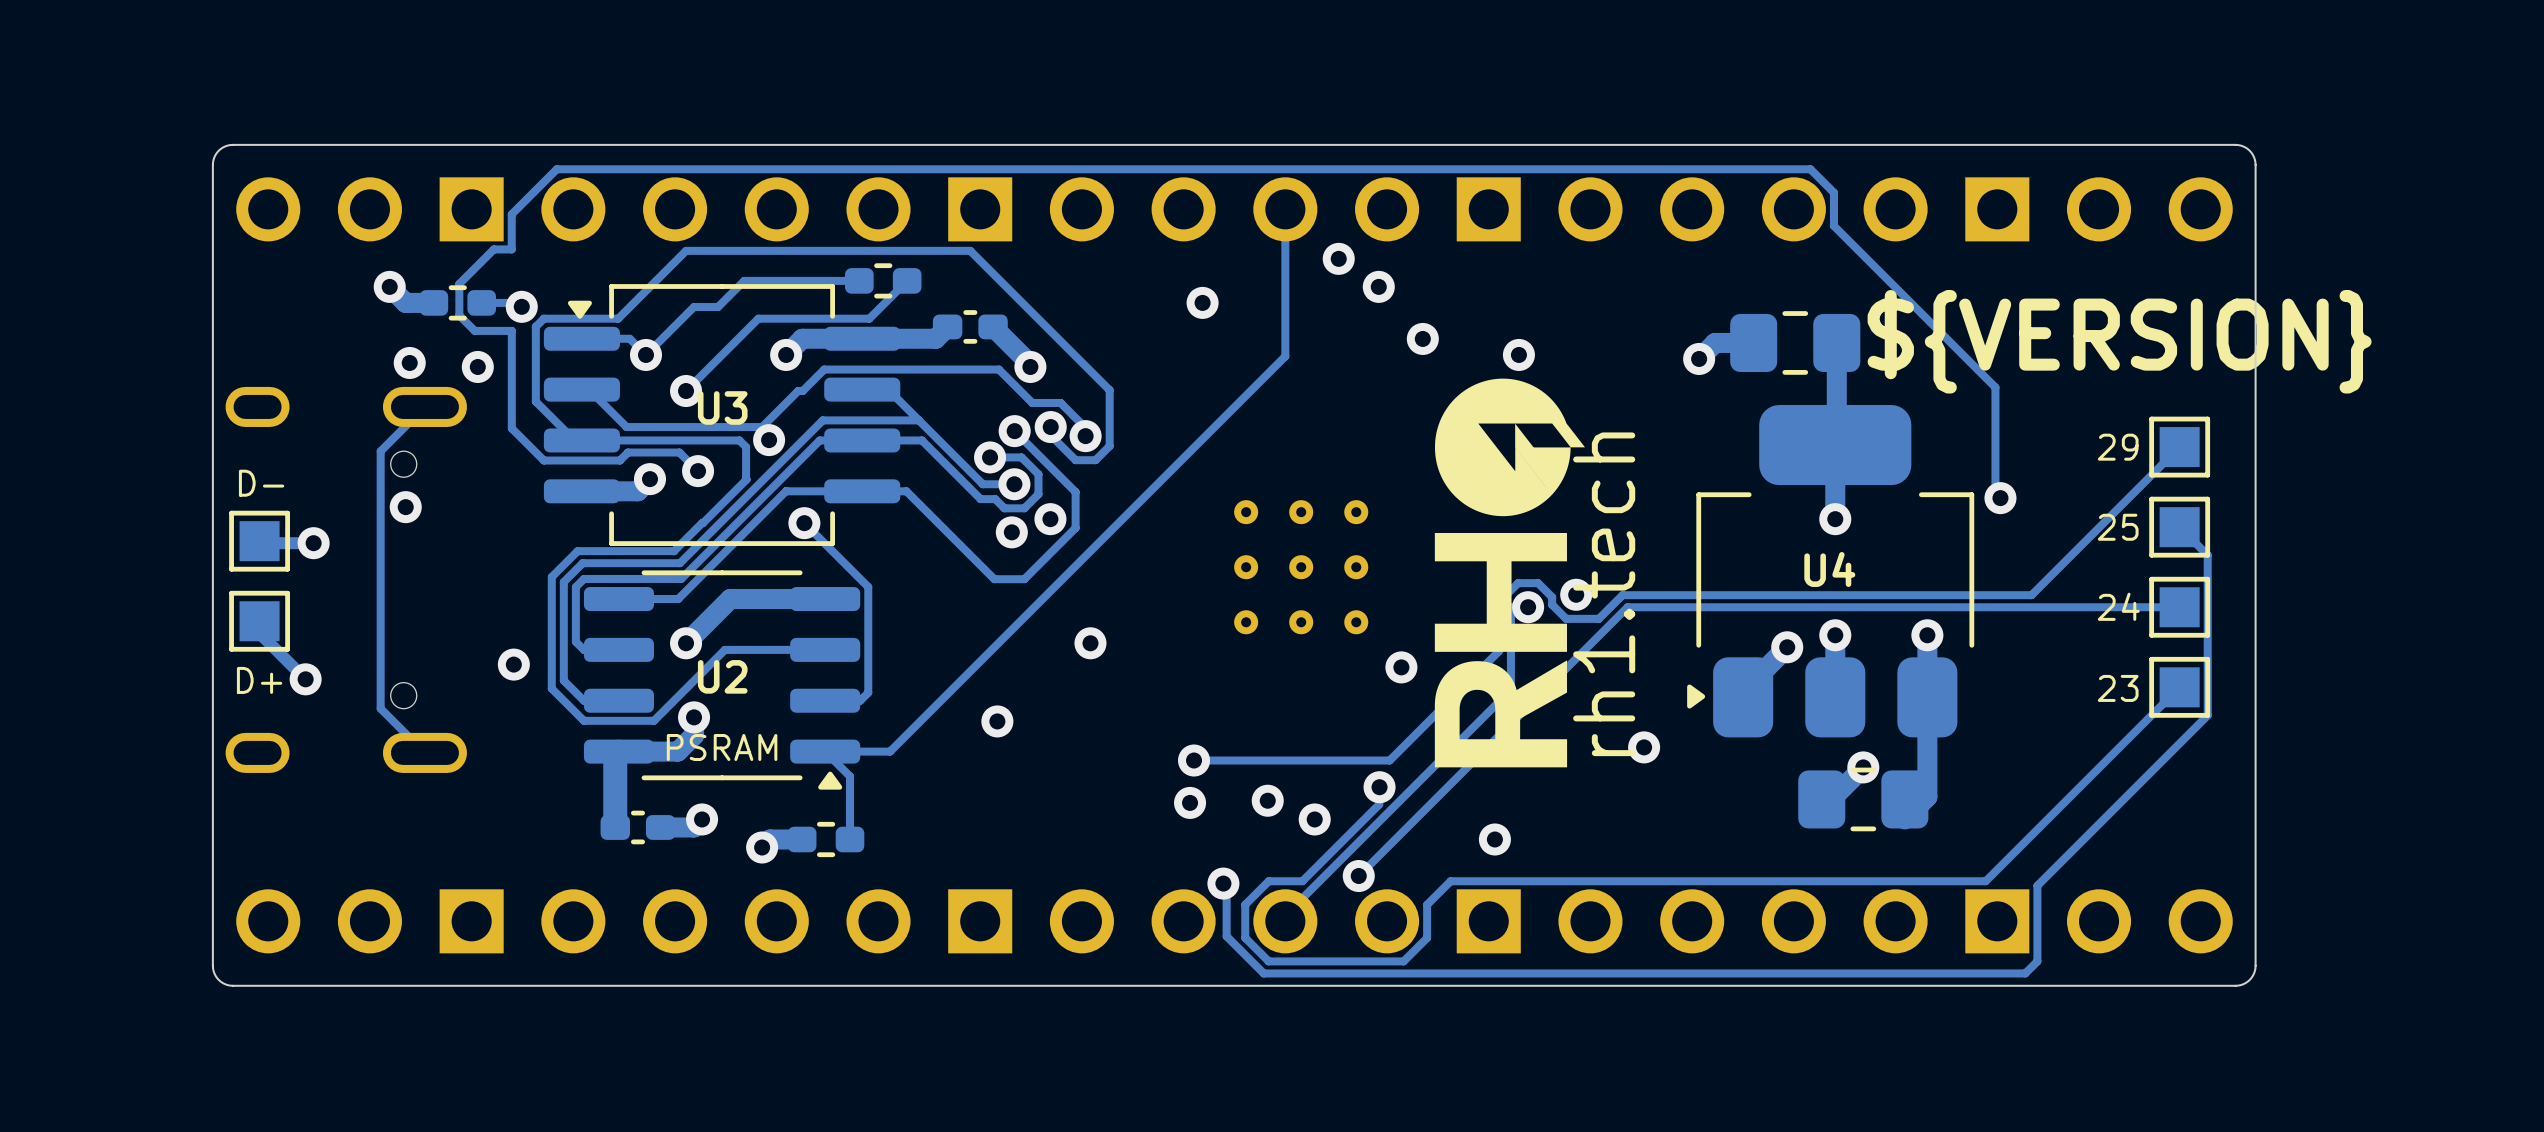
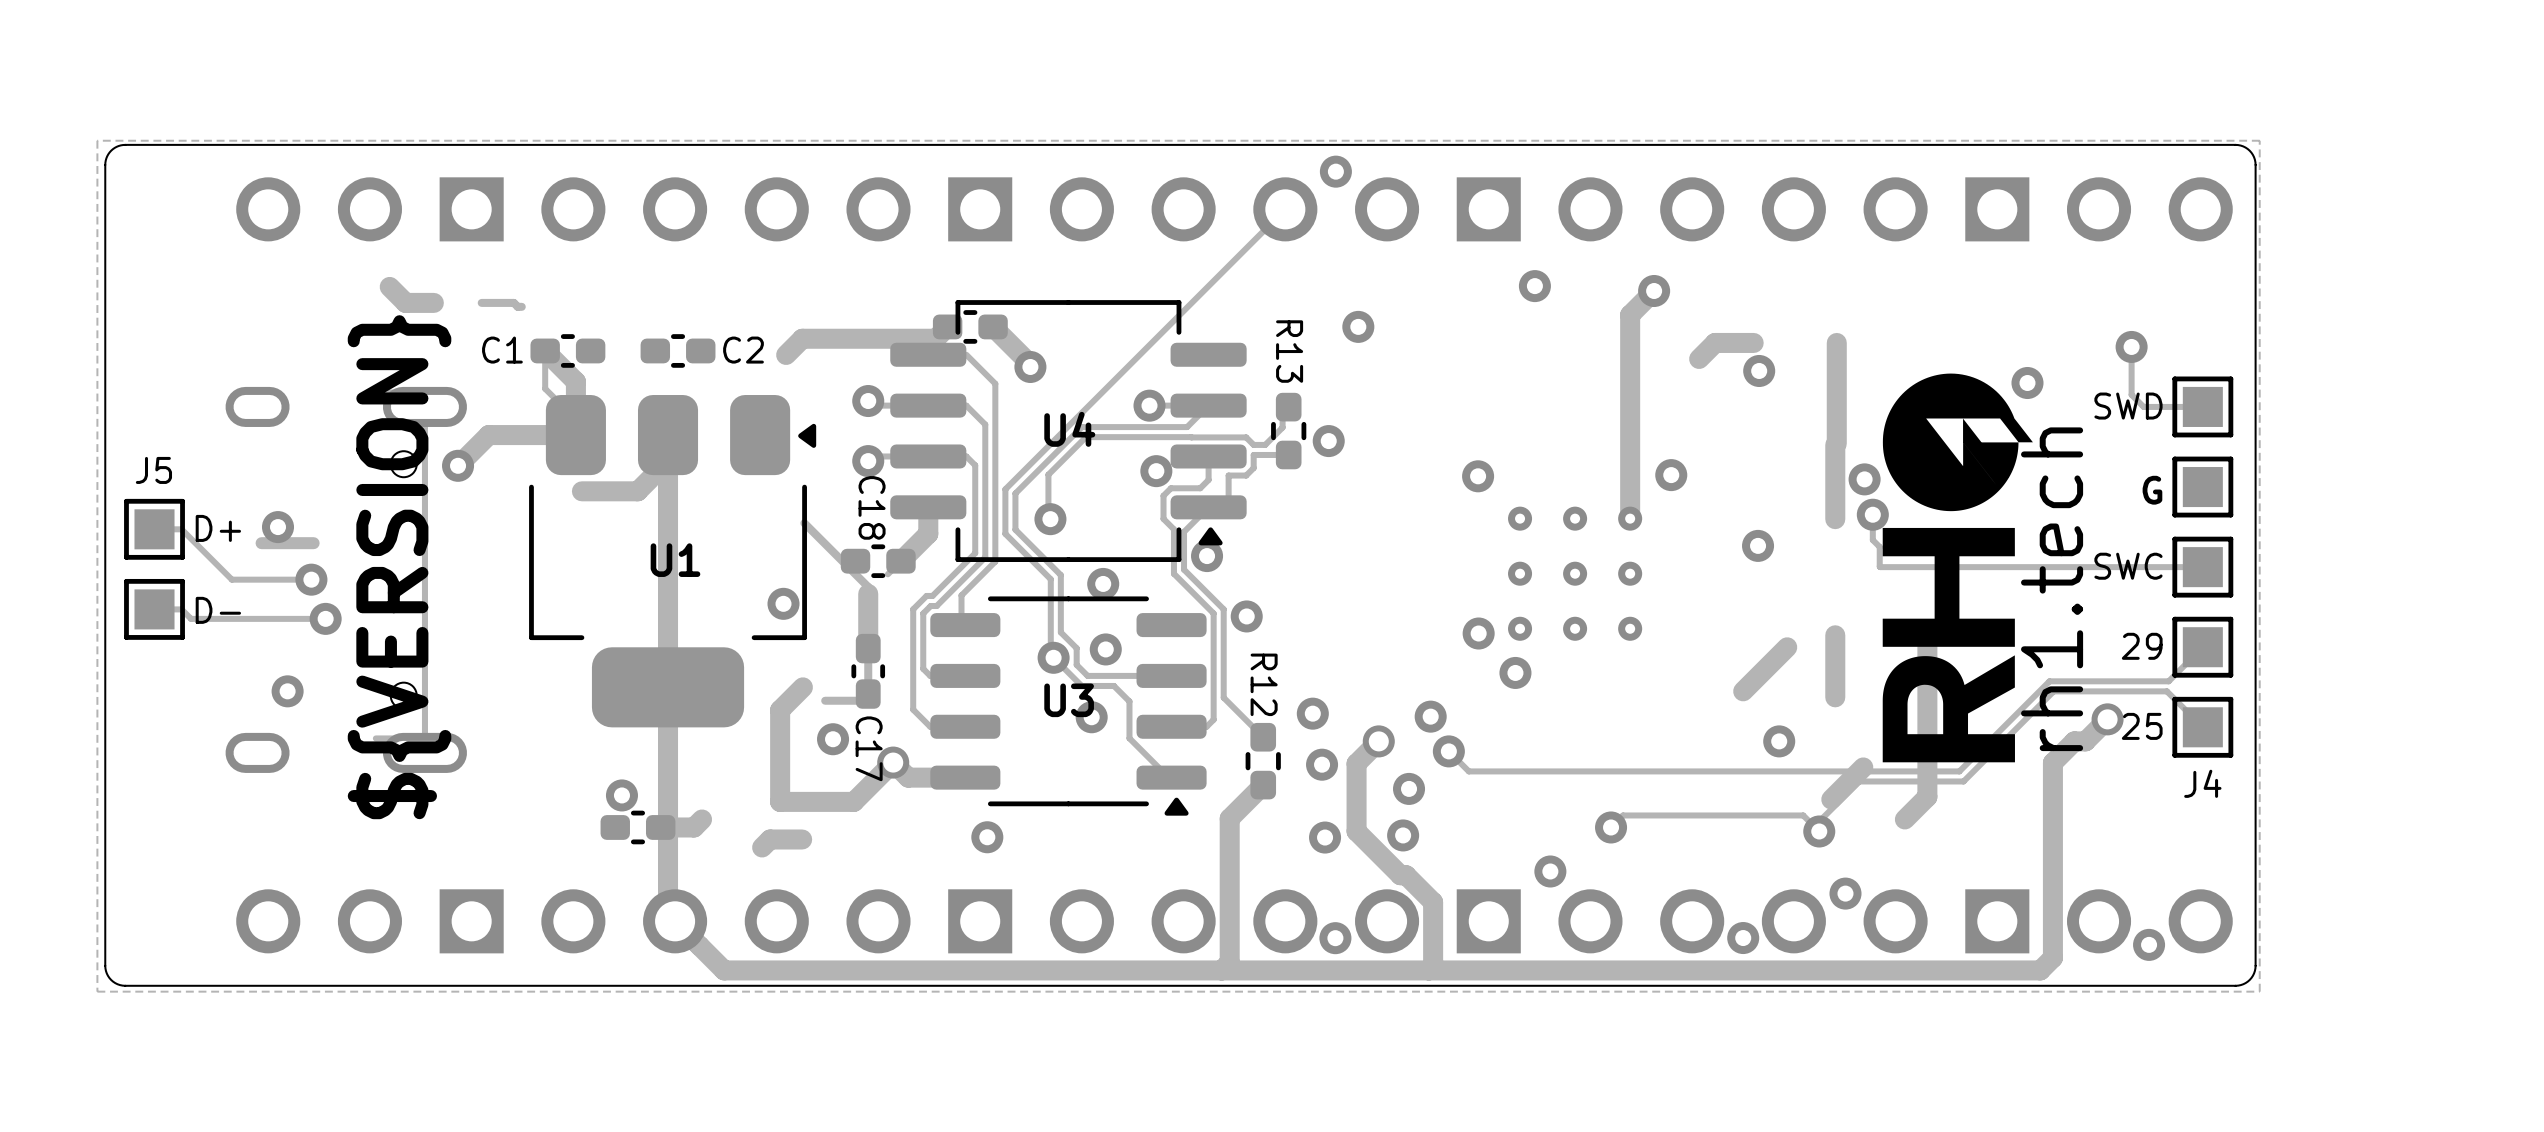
zone outline: none -> (2259, 140) (97, 140) (97, 991) (2259, 991) (2259, 140)
board edge: (232, 144) (218, 150) (212, 164) (212, 965) (214, 973) (218, 979) (225, 984) (232, 985) -> (232, 144) (123, 145) (111, 150) (105, 164) (105, 968) (111, 979) (122, 985) (232, 985)
via: none -> (1335, 171)
track: (1285, 209) (1285, 356) (890, 751) (825, 751) (850, 776) (850, 839) -> (1285, 209) (1005, 489) (1005, 533) (1050, 579) (1050, 646) (1061, 657) (1053, 657) (1081, 685) (1113, 685) (1129, 701) (1129, 738) (1168, 777)
via: (1338, 258) -> none
track: (859, 280) (744, 280) (718, 307) (693, 307) (645, 354) (629, 338) (581, 338) -> none
part: (883, 280) -> none
track: (907, 280) (869, 318) (758, 318) (686, 391) -> none
U3 footprint: [543, 284, 901, 546] -> [930, 596, 1207, 816]
via: (389, 286) -> none
via: (1378, 286) -> none
via: none -> (1534, 286)
track: none -> (1654, 291) (1630, 314) (1630, 518)
via: none -> (1654, 291)
part: (457, 302) -> none
via: (1202, 302) -> none
via: (521, 306) -> none
via: none -> (1358, 326)
via: (1422, 338) -> none
text: ${VERSION} (2119, 341) -> none
part: (1795, 342) -> none
track: none -> (2131, 346) (2131, 394) (2143, 406) (2202, 406)
via: none -> (2131, 346)
track: none -> (545, 350) (545, 388) (575, 419) (575, 381) (545, 350)
C1: none -> (567, 350)
C2: none -> (678, 350)
via: (645, 354) -> none
via: (786, 354) -> none
track: none -> (966, 354) (995, 383) (995, 561) (961, 595) (961, 621)
via: (1518, 354) -> none
via: (1699, 358) -> none
via: (409, 362) -> none
via: (477, 366) -> none
via: none -> (1759, 370)
via: none -> (2027, 383)
track: (589, 389) (626, 427) (762, 427) (798, 391) (802, 391) (824, 369) (998, 369) (1032, 402) (1060, 402) (1085, 427) (1085, 436) -> none
track: (888, 389) (982, 484) (1014, 484) -> none
via: (686, 391) -> none
track: none -> (375, 392) (424, 392) (424, 738) (375, 738)
track: none -> (868, 401) (872, 405) (966, 405) (985, 424) (985, 557) (936, 606) (930, 606) (923, 613) (923, 668) (930, 675) (965, 675)
via: none -> (868, 401)
track: none -> (1282, 401) (1282, 427) (1265, 444) (1253, 444) (1246, 437) (1191, 437)
track: none -> (1149, 405) (1208, 405) (1187, 427) (1081, 427) (1015, 493) (1015, 529) (1060, 575) (1060, 632) (1076, 648) (1076, 664) (1087, 675) (1171, 675)
via: none -> (1149, 405)
U4 footprint: [1687, 405, 1975, 738] -> [890, 300, 1247, 562]
track: (424, 406) (380, 451) (380, 708) (424, 752) -> none
text: none -> SWD (2128, 406)
track: (918, 420) (822, 420) (679, 563) (582, 563) (563, 582) (563, 680) (583, 700) (618, 700) -> none
track: (1050, 427) (1050, 435) (1075, 460) (1095, 460) (1109, 446) (1109, 390) (970, 250) (686, 250) (618, 318) (543, 318) (535, 326) (535, 401) (574, 440) -> none
via: (1050, 427) -> none
track: (1014, 431) (1075, 492) (1075, 527) (1024, 579) (994, 579) (906, 491) (786, 491) -> none
via: (1014, 431) -> none
R13: none -> (1288, 431)
track: none -> (575, 435) (488, 435) (458, 465)
track: none -> (668, 435) (668, 914)
drawing position: (1524, 435) -> (1972, 430)
via: (1085, 436) -> none
track: none -> (1191, 437) (1085, 437) (1048, 474) (1048, 511)
track: (581, 440) (739, 440) (746, 447) (746, 479) -> none
via: (769, 440) -> none
via: none -> (1328, 441)
drawing position: (1510, 447) -> (1957, 442)
text position: 29 (2118, 447) -> 29 (2142, 646)
track: (2179, 447) (2031, 595) (1622, 595) (1598, 618) (1566, 618) (1552, 604) (1552, 597) (1538, 583) (1518, 583) (1498, 602) (1498, 651) (1389, 760) (1194, 760) -> none
track: none -> (1288, 454) (1253, 454) (1253, 468) (1246, 475) (1228, 475) (1228, 499)
track: none -> (1208, 456) (1208, 479) (1200, 488) (1170, 488) (1163, 495) (1163, 518) (1173, 529) (1173, 573) (1213, 613) (1213, 719) (1206, 726) (1171, 726)
track: (990, 457) (1021, 457) (1038, 474) (1038, 494) (1024, 508) (1004, 508) (995, 499) (980, 499) (921, 440) (819, 440) (681, 578) (583, 578) (575, 587) (575, 641) (583, 649) (618, 649) -> none
via: (990, 457) -> none
track: none -> (868, 461) (872, 456) (966, 456) (975, 465) (975, 553) (932, 595) (926, 595) (913, 609) (913, 709) (930, 726) (965, 726)
via: none -> (868, 461)
via: none -> (458, 465)
drawing position: (1552, 465) -> (1999, 460)
track: (698, 471) (679, 452) (627, 452) (619, 460) (543, 460) (511, 428) (511, 330) (474, 330) (459, 315) (459, 283) (493, 249) (511, 249) (511, 214) (556, 169) (1810, 169) (1833, 192) (1833, 225) (1995, 387) (1995, 493) (2000, 498) -> none
via: (698, 471) -> none
via: none -> (1156, 471)
via: none -> (1671, 475)
via: none -> (1478, 476)
via: (650, 479) -> none
track: (746, 479) (674, 551) (577, 551) (551, 577) (551, 688) (583, 720) (653, 720) (724, 649) (825, 649) -> none
via: none -> (1864, 479)
text position: D- (261, 483) -> D- (218, 610)
via: (1014, 484) -> none
text: none -> G (2152, 490)
track: (786, 491) (678, 599) (618, 599) -> none
via: (2000, 498) -> none
via: (405, 507) -> none
track: none -> (928, 507) (928, 533) (887, 574)
track: none -> (1208, 507) (1184, 531) (1184, 569) (1223, 609) (1223, 697) (1263, 737)
track: none -> (1872, 514) (1872, 540) (1879, 546) (1879, 566)
via: none -> (1872, 514)
via: (1835, 519) -> none
via: (804, 523) -> none
via: none -> (277, 527)
text position: 25 (2118, 527) -> 25 (2142, 726)
track: (2179, 527) (2207, 555) (2207, 715) (2037, 885) (2037, 961) (2025, 973) (1263, 973) (1226, 936) (1226, 891) -> none
track: none -> (154, 529) (181, 529) (231, 579) (311, 579)
via: (1011, 532) -> none
via: (313, 543) -> none
via: none -> (1758, 545)
via: none -> (1207, 556)
U1: none -> (672, 561)
C18: none -> (878, 561)
text: none -> SWC (2128, 566)
text: none -> ${VERSION} (399, 567)
part position: (1301, 567) -> (1575, 573)
part: (2179, 567) -> none
track: none -> (2202, 567) (1880, 567)
J4: none -> (2202, 567)
J5: none -> (154, 569)
via: none -> (311, 579)
part: (259, 581) -> none
via: none -> (1103, 583)
track width: thin (868, 587) (868, 692) -> thick (868, 587) (868, 692)
drawing position: (1500, 592) -> (1948, 587)
via: (1576, 594) -> none
text position: rh1.tech (1604, 594) -> rh1.tech (2052, 589)
track: (825, 599) (730, 599) (686, 643) -> none
via: none -> (783, 603)
text: 24 (2118, 606) -> none
track: (1528, 607) (1511, 607) (1510, 689) (1285, 915) -> none
via: (1528, 607) -> none
track: (2179, 607) (1627, 607) (1358, 876) -> none
track: none -> (154, 609) (181, 609) (191, 618) (325, 618)
via: none -> (1246, 616)
via: none -> (325, 618)
track: (259, 633) (305, 679) -> none
via: none -> (1478, 633)
via: (1835, 635) -> none
via: (1927, 635) -> none
via: (686, 643) -> none
via position: (1090, 643) -> (1105, 649)
via: (1787, 647) -> none
track: none -> (2202, 647) (2168, 681) (2049, 681) (1959, 771) (1468, 771) (1448, 751)
via: none -> (1053, 657)
via: (513, 664) -> none
via: (1401, 667) -> none
C17: none -> (868, 671)
via: none -> (1515, 672)
via position: (305, 679) -> (287, 691)
text position: D+ (259, 680) -> D+ (218, 528)
U2: (722, 680) -> none
track: none -> (802, 687) (780, 710) (780, 801) (853, 801) (893, 762) (908, 777) (965, 777)
track: (2179, 687) (1985, 881) (1450, 881) (1427, 904) (1427, 937) (1403, 961) (1268, 961) (1245, 937) (1245, 904) (1268, 881) (1302, 881) (1379, 804) (1379, 787) -> none
text: 23 (2118, 688) -> none
via: none -> (1312, 713)
drawing position: (1500, 713) -> (1948, 708)
via: none -> (1430, 716)
track: (694, 717) (694, 735) (677, 751) (618, 751) (615, 755) (615, 827) -> none
via: (694, 717) -> none
via: none -> (1091, 717)
track: none -> (2107, 719) (2085, 741) (2074, 741) (2052, 762) (2052, 957) (2040, 970) (724, 970) (675, 921) (699, 945)
via: none -> (2107, 719)
via: (997, 721) -> none
track: none -> (2202, 727) (2166, 691) (2053, 691) (1963, 781) (1859, 781) (1819, 821) (1819, 831) (1803, 815) (1623, 815) (1611, 827)
via: none -> (833, 739)
track: none -> (1378, 741) (1356, 763) (1356, 831) (1400, 875) (1406, 875) (1433, 902) (1433, 966) (1428, 970)
via: none -> (1378, 741)
via: none -> (1779, 741)
text: PSRAM (722, 747) -> none
via: (1644, 747) -> none
via: none -> (1448, 751)
via: (1194, 760) -> none
R12: none -> (1263, 761)
via: none -> (893, 762)
via: none -> (1322, 764)
via: (1863, 767) -> none
track: none -> (1263, 785) (1229, 818) (1229, 962) (1221, 970)
via position: (1379, 787) -> (1409, 788)
via: none -> (621, 795)
part: (1863, 799) -> none
via: (1267, 800) -> none
via: (1190, 802) -> none
via: (702, 819) -> none
via position: (1314, 819) -> (1325, 837)
via: none -> (1611, 827)
via: none -> (1819, 831)
via: none -> (1403, 835)
via: none -> (987, 837)
part: (826, 839) -> none
via: (1494, 839) -> none
via: (762, 847) -> none
via: none -> (1550, 871)
via: (1358, 876) -> none
via: (1223, 883) -> none
via: none -> (1845, 893)
via: none -> (1335, 938)
via: none -> (1743, 938)
via: none -> (2149, 944)

